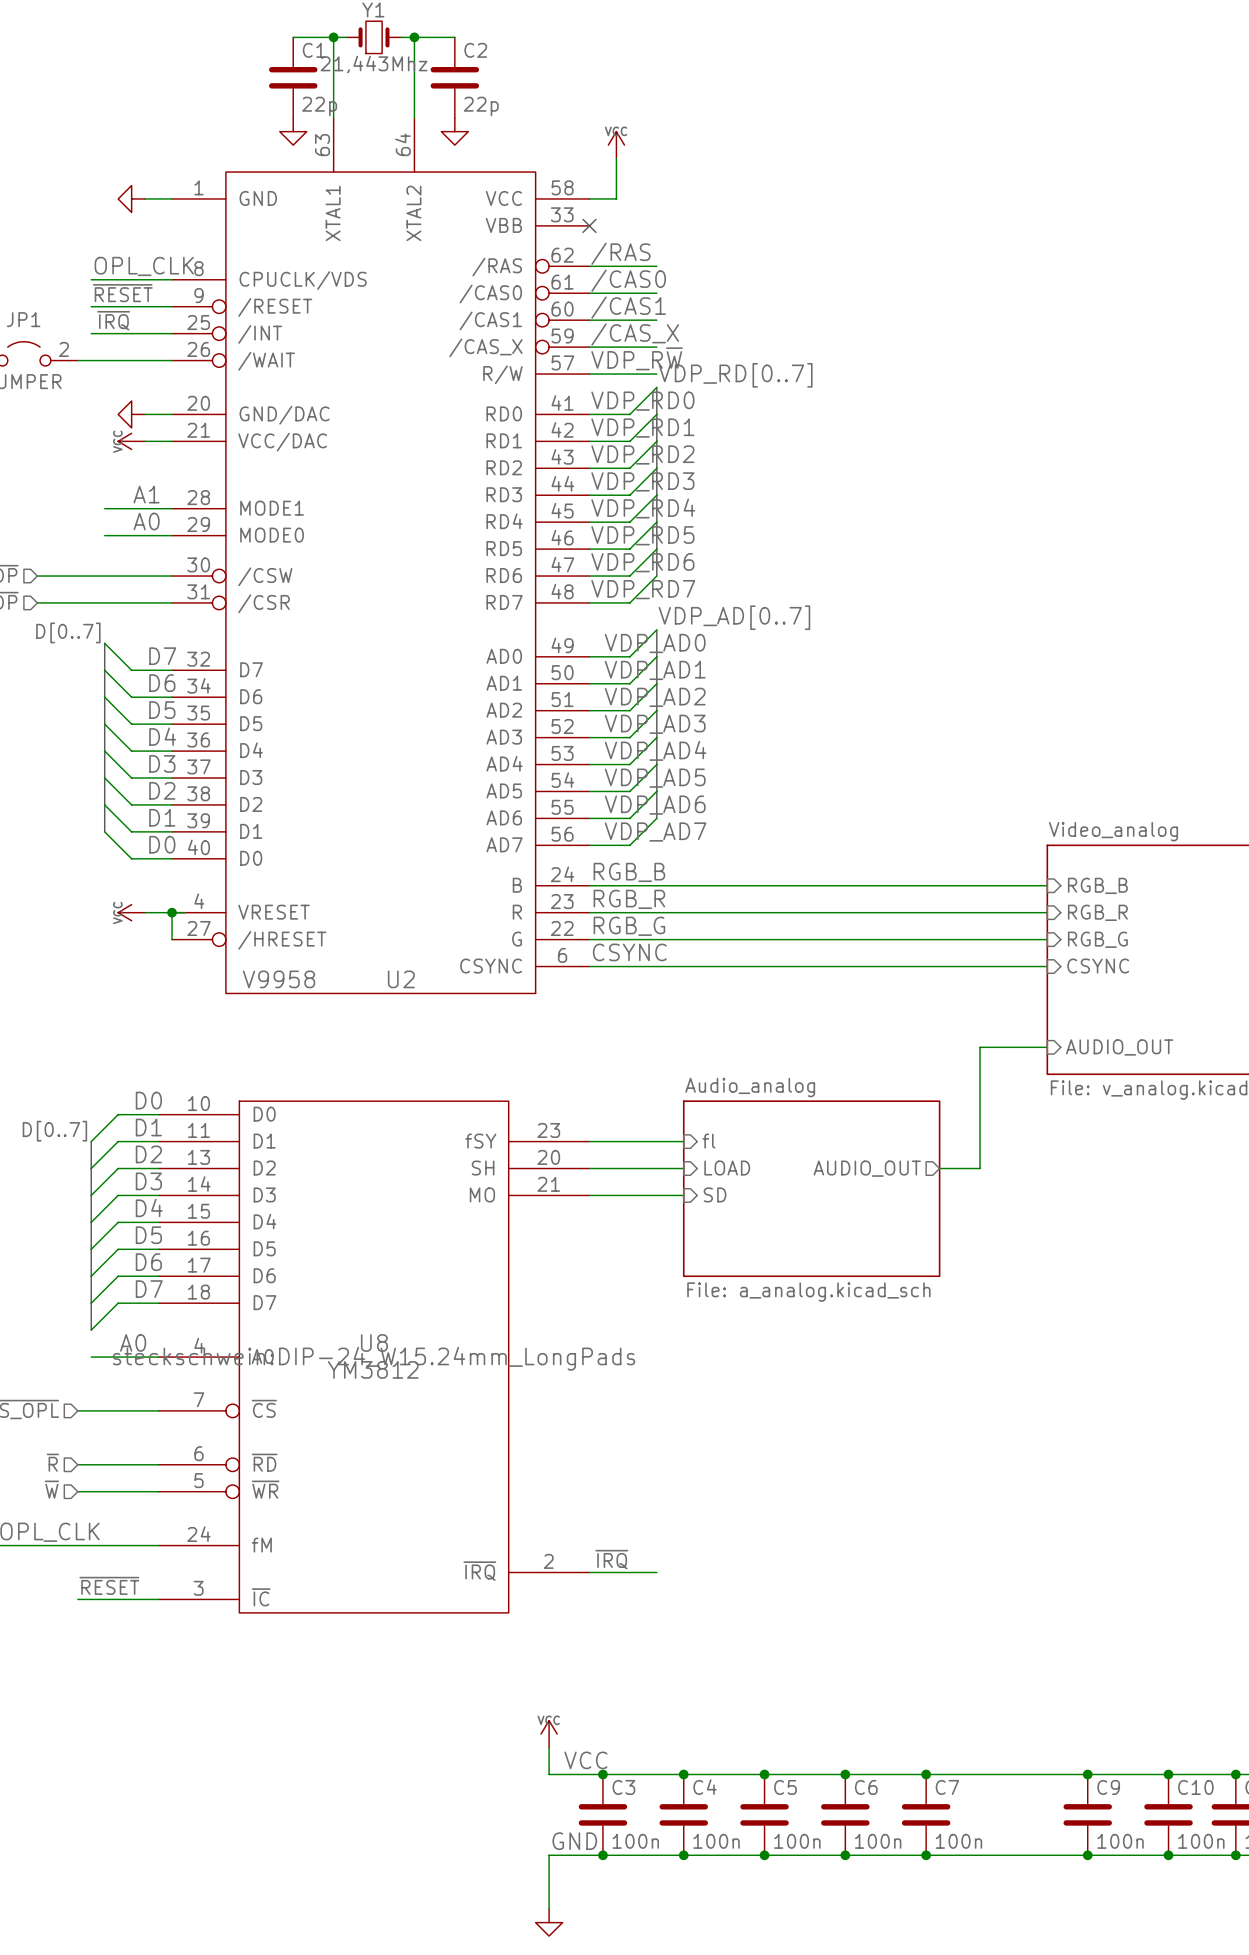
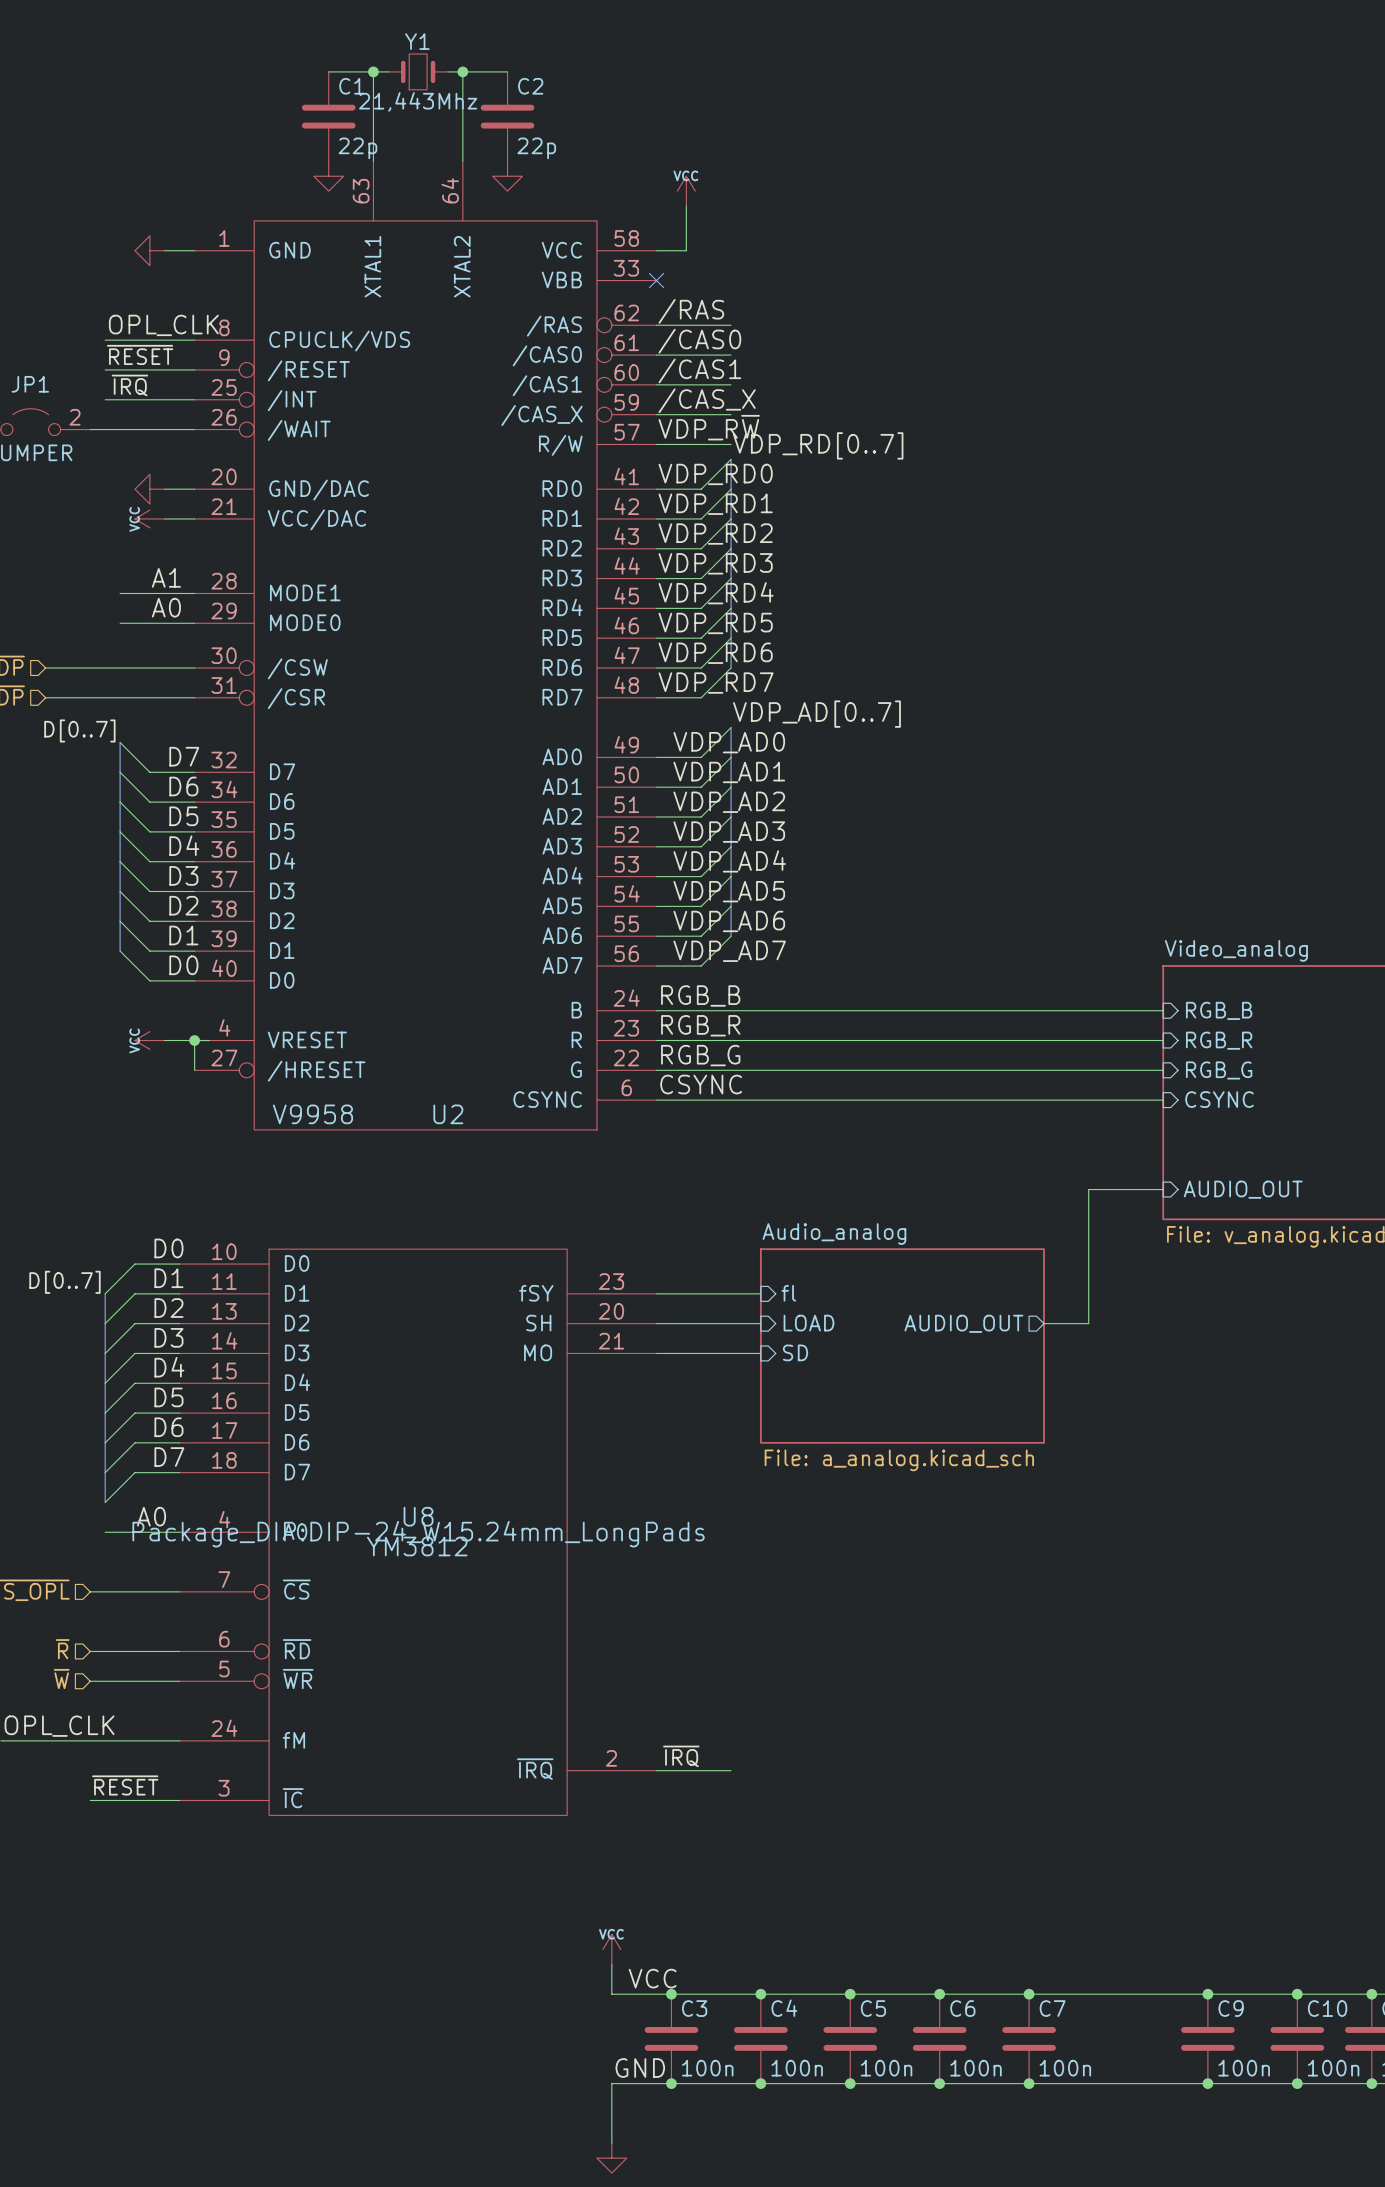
U8 text: steckschwein:DIP-24_W15.24mm_LongPads (374, 1358) -> Package_DIP:DIP-24_W15.24mm_LongPads (418, 1534)

